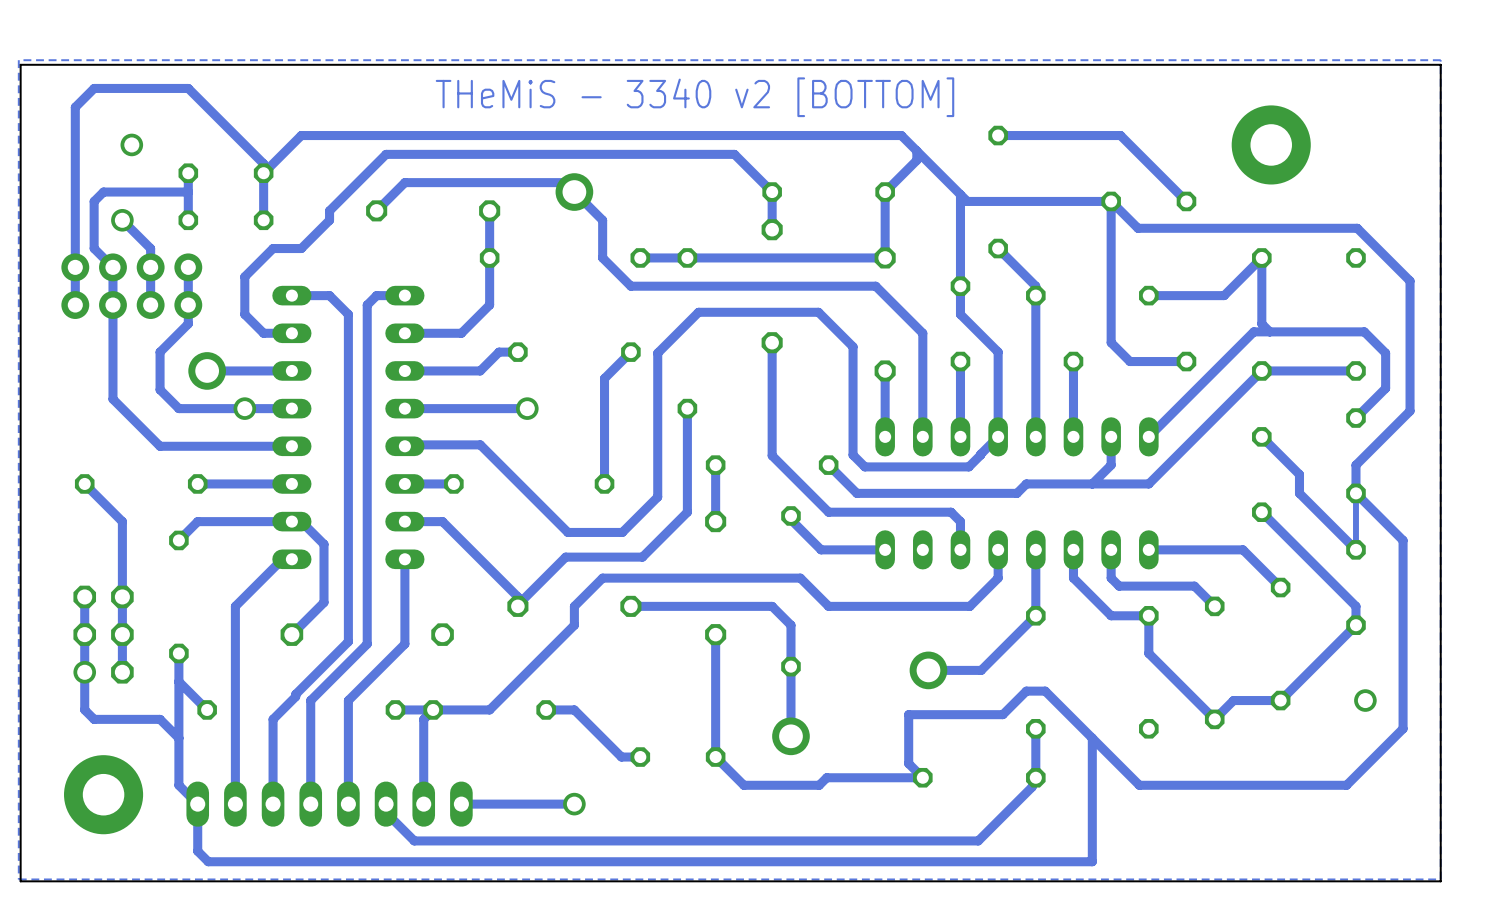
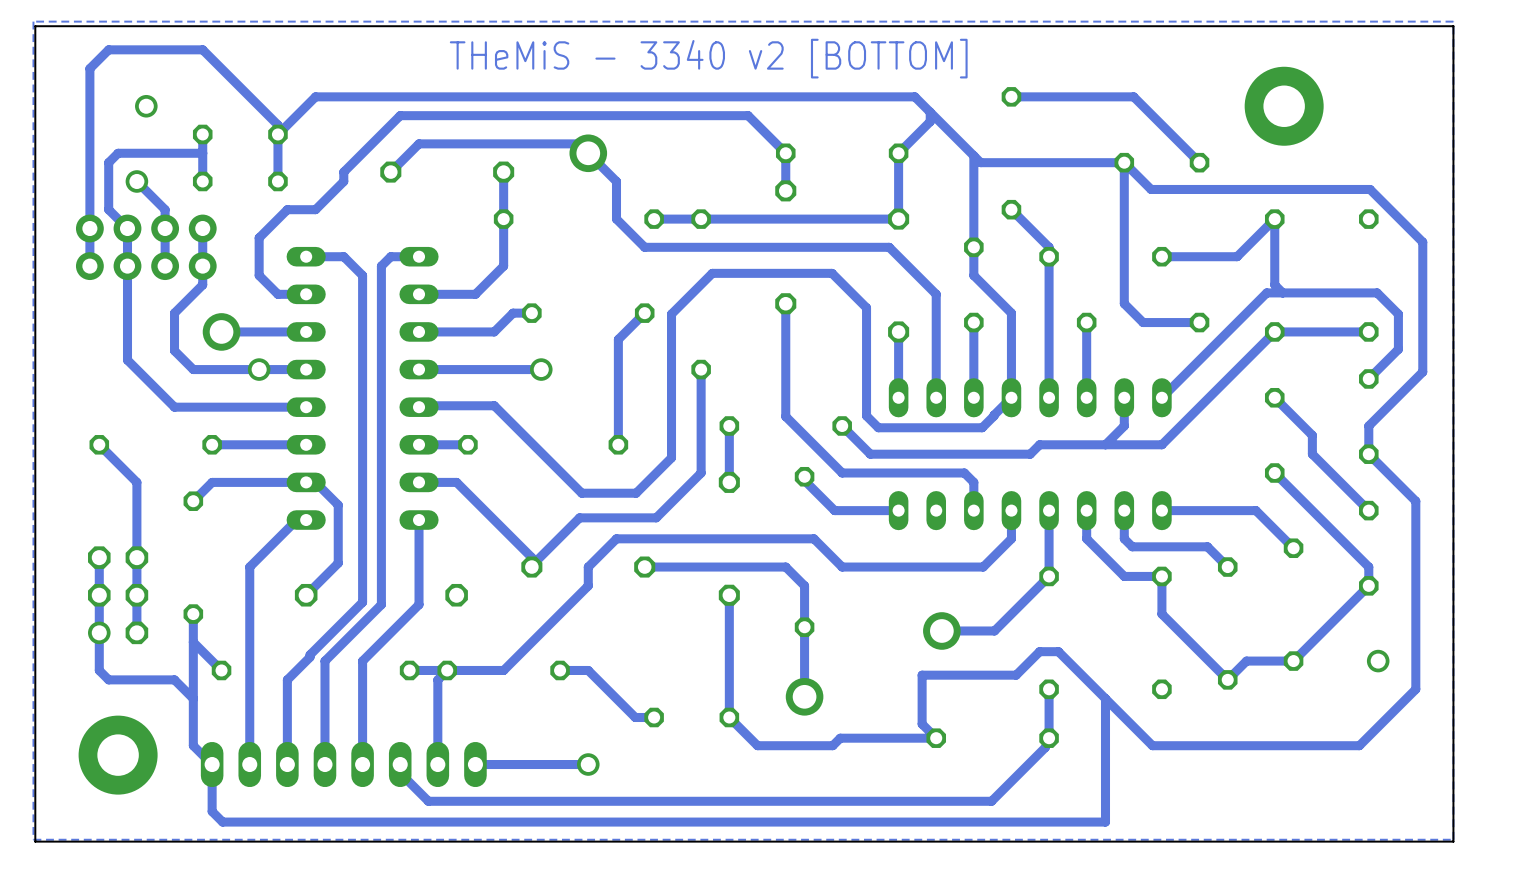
track: (1355, 493) (1355, 549) -> none

